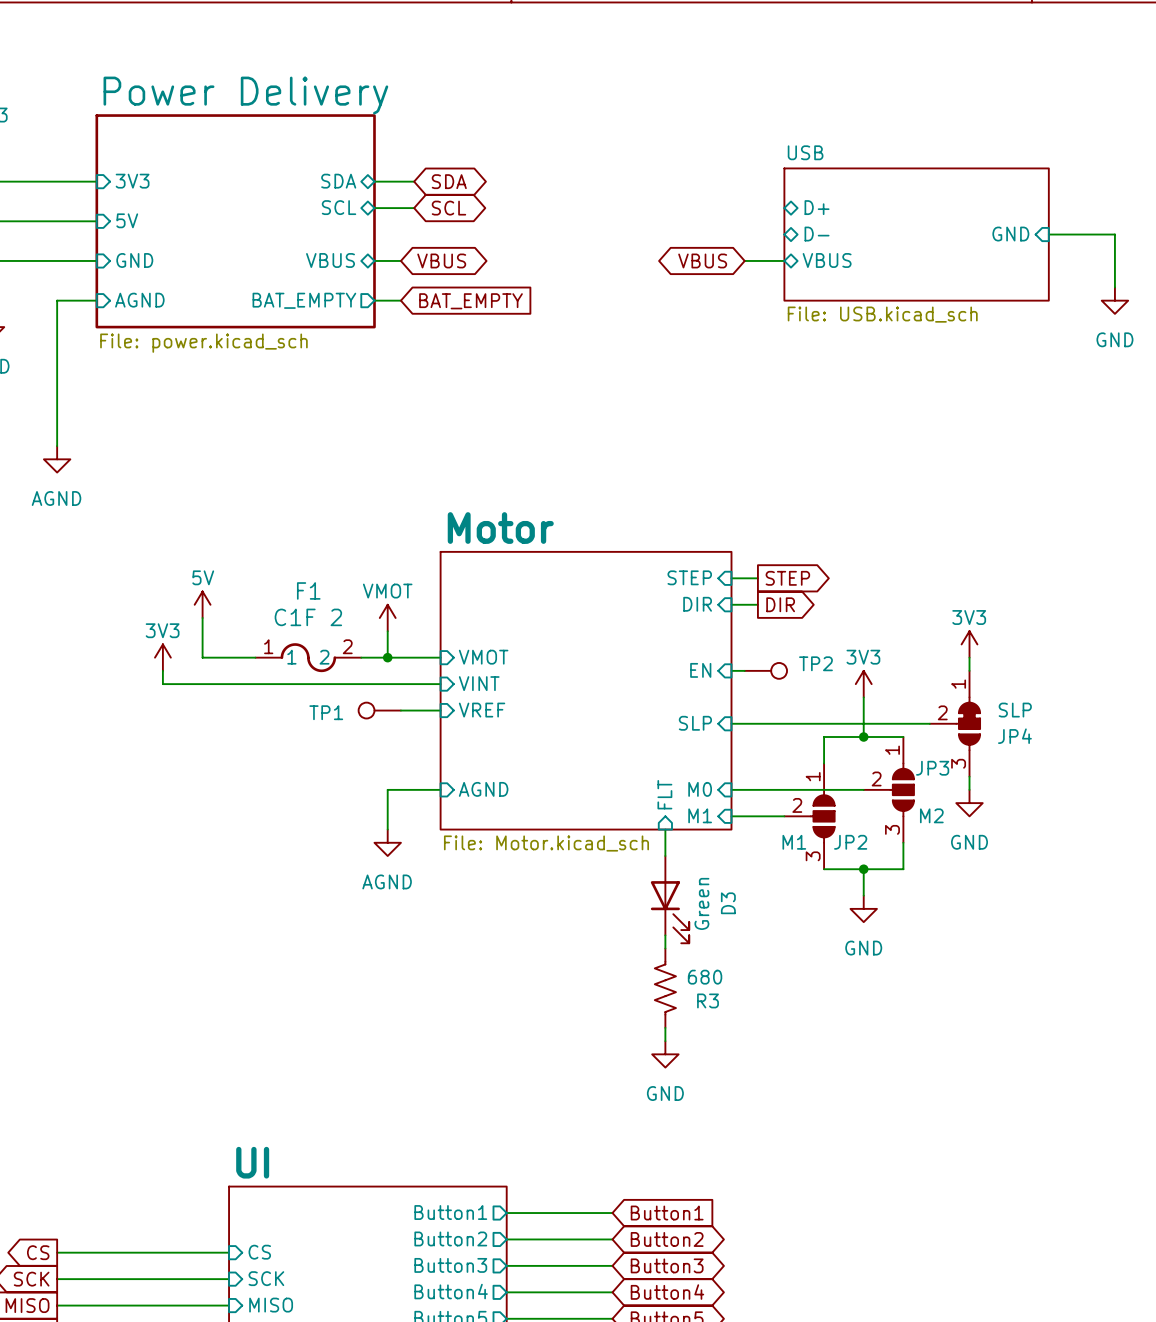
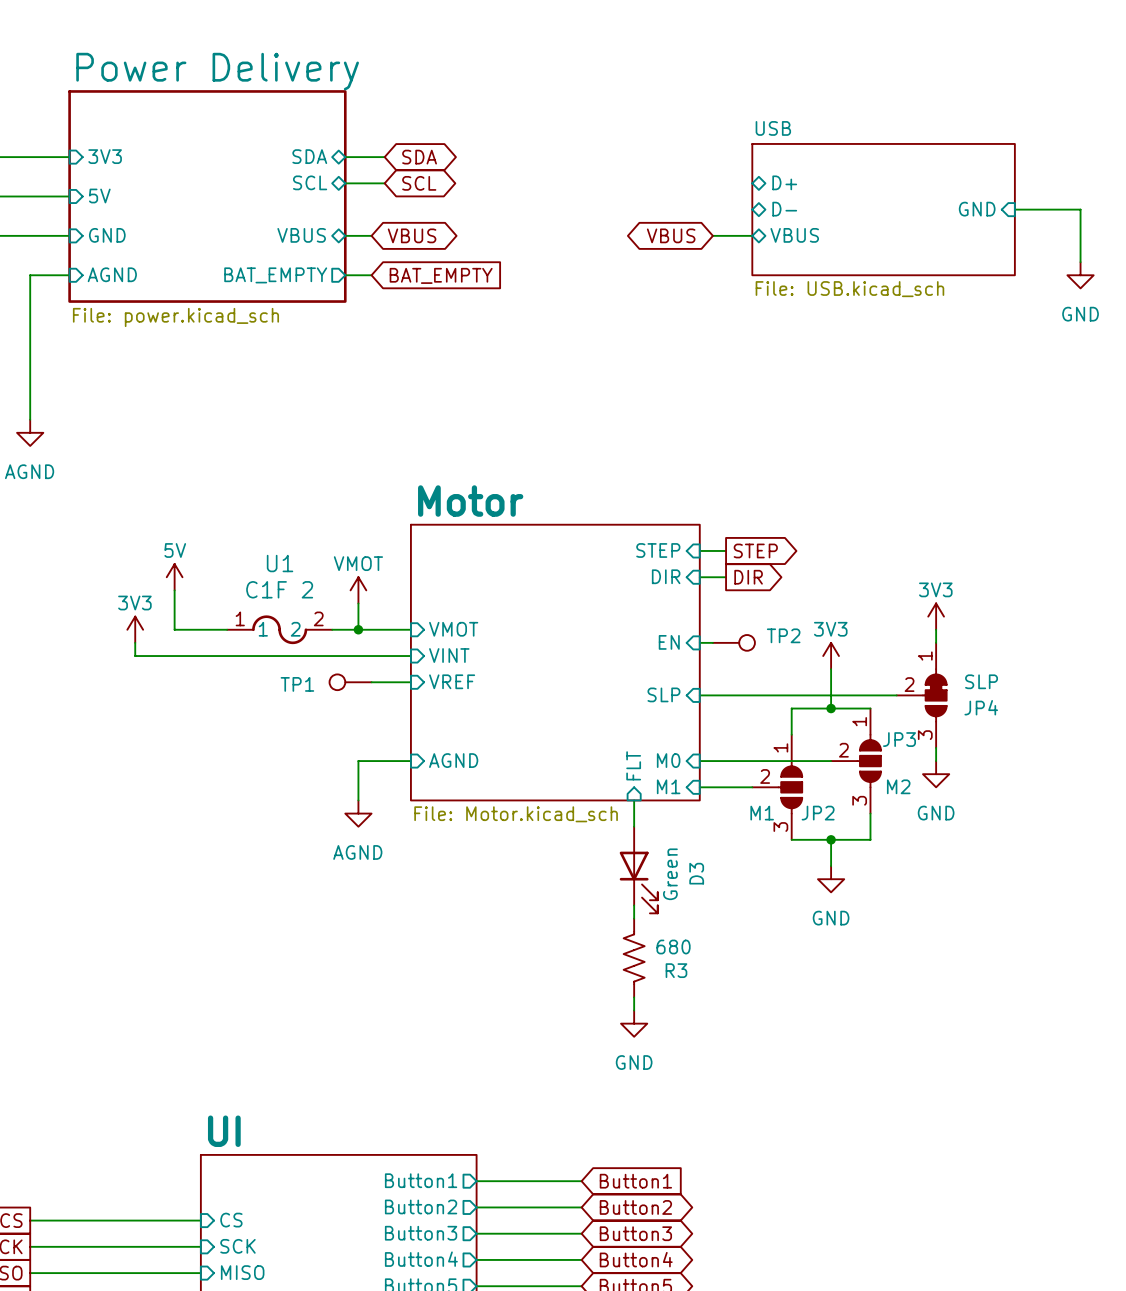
F1 name: F1 (308, 590) -> U1 (280, 563)

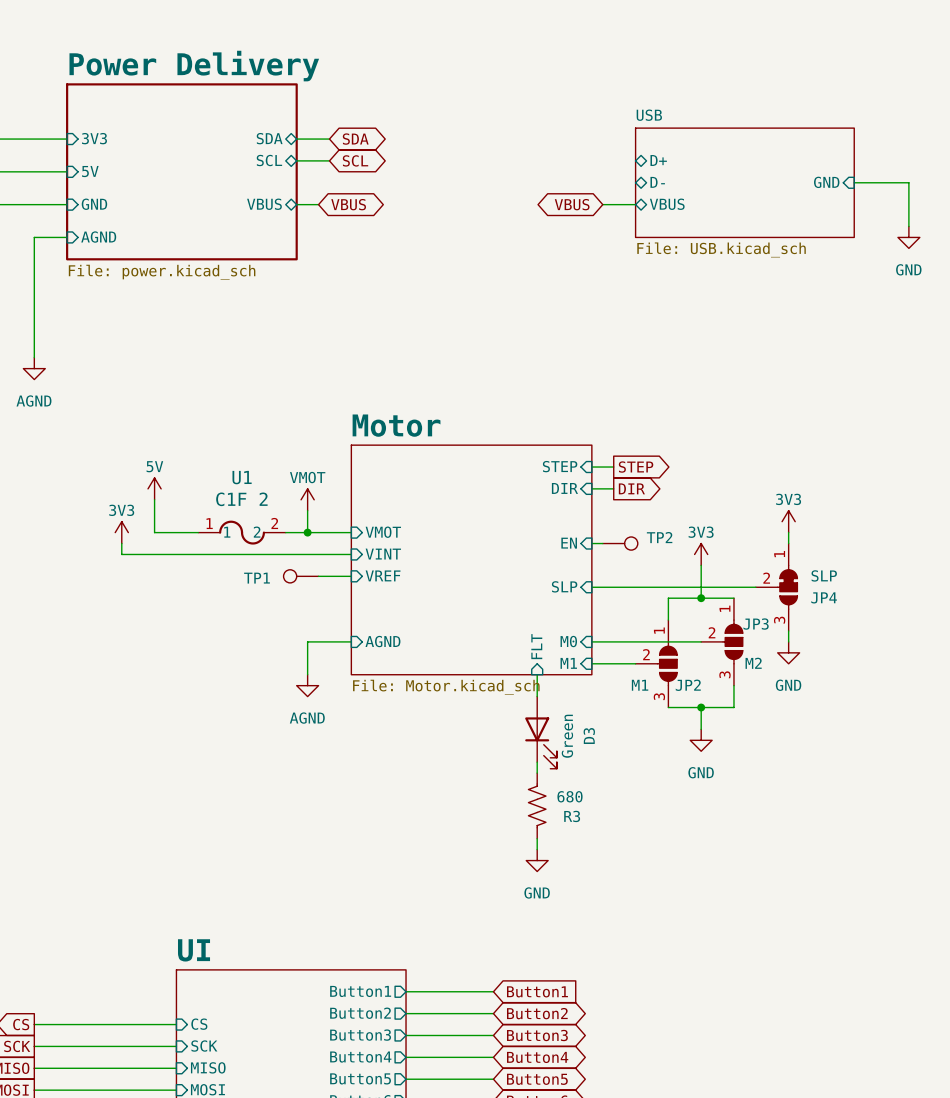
sheet pin: BAT_EMPTY (275, 275) -> none
wire: (345, 275) (371, 275) -> none
global label: BAT_EMPTY (441, 275) -> none

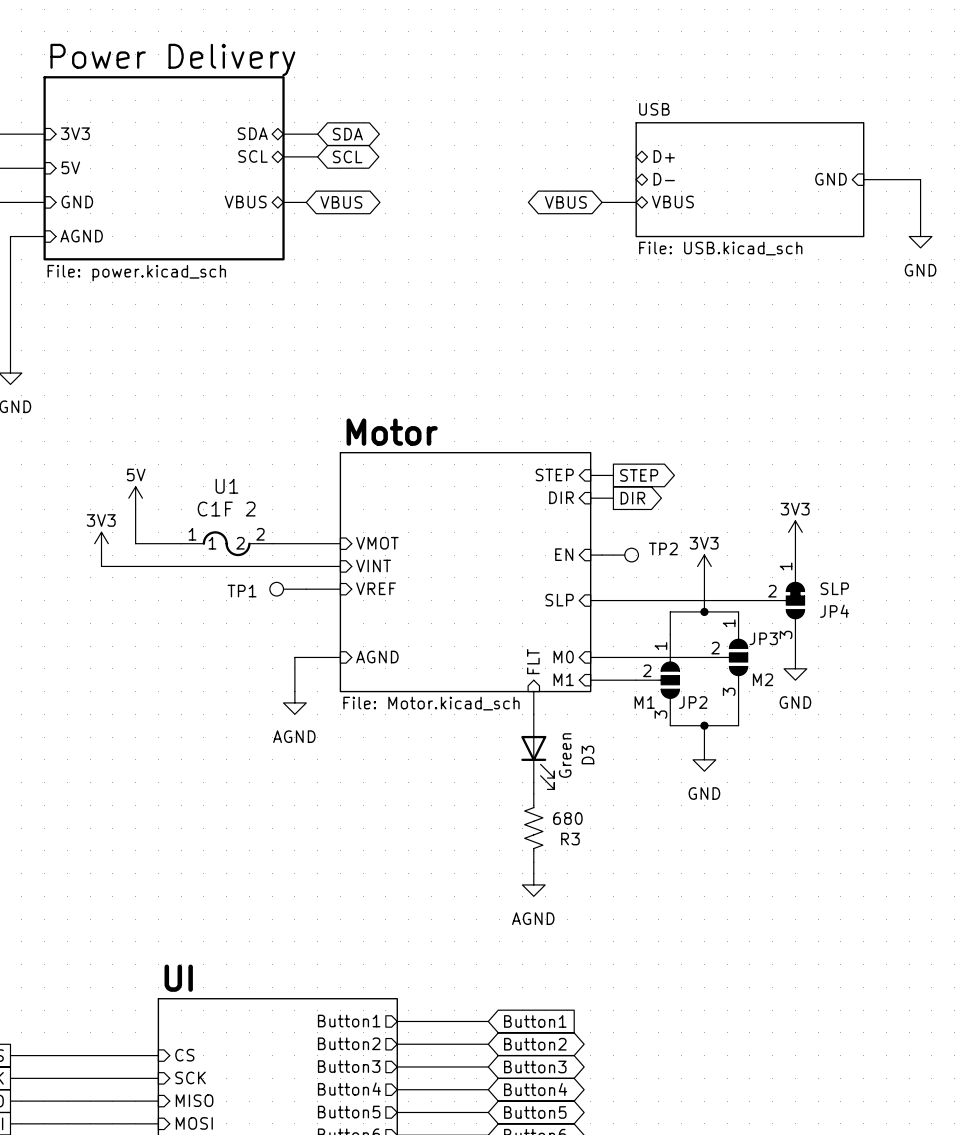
power symbol: VMOT (307, 499) -> none
wire: (307, 510) (307, 532) -> none
junction: (307, 532) -> none
power symbol: GND (537, 860) -> AGND (533, 884)

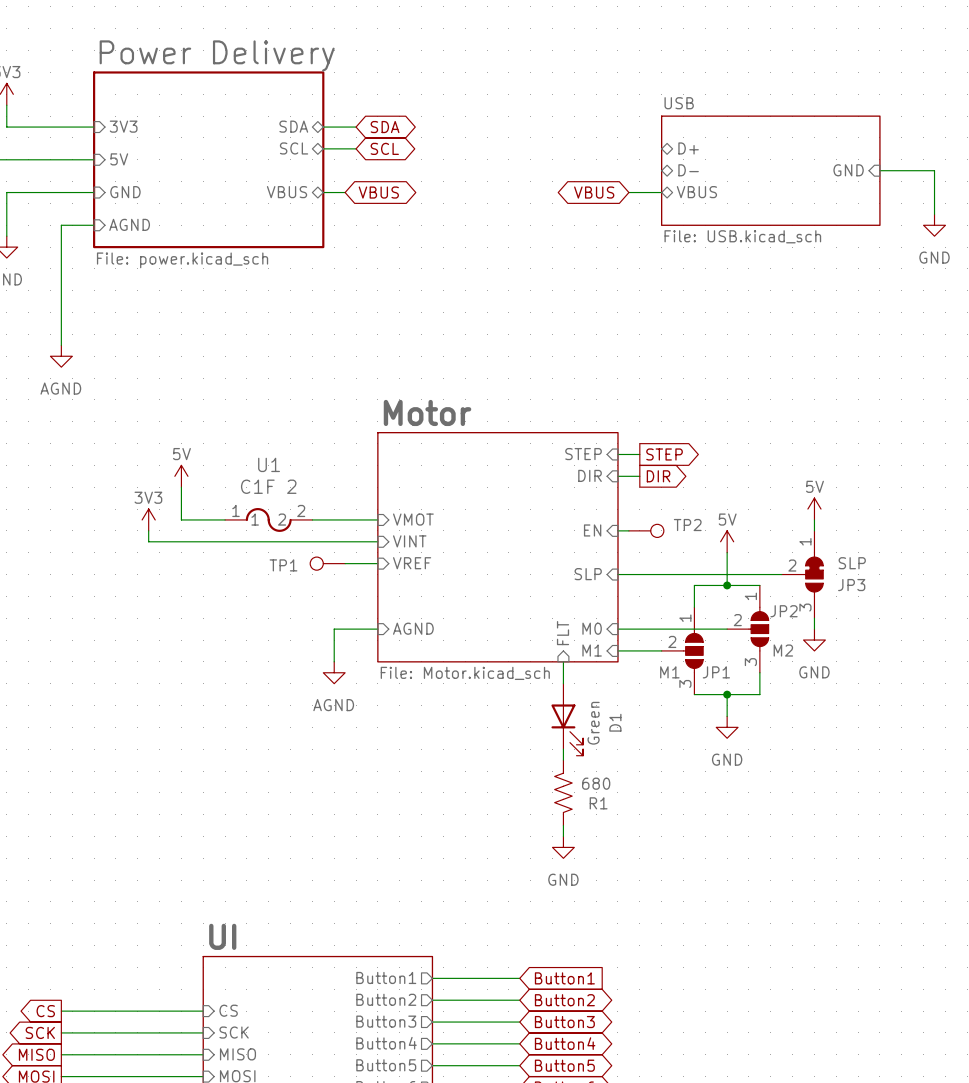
power symbol: 3V3 (795, 532) -> 5V (814, 509)
power symbol: 3V3 (704, 566) -> 5V (727, 541)
JP4 name: JP4 (834, 611) -> JP3 (851, 585)
JP3 name: JP3 (763, 638) -> JP2 (784, 611)
JP2 name: JP2 (693, 702) -> JP1 (716, 672)
D3 name: D3 (587, 755) -> D1 (615, 722)
R3 name: R3 (570, 839) -> R1 (598, 803)
power symbol: AGND (533, 884) -> GND (563, 847)

